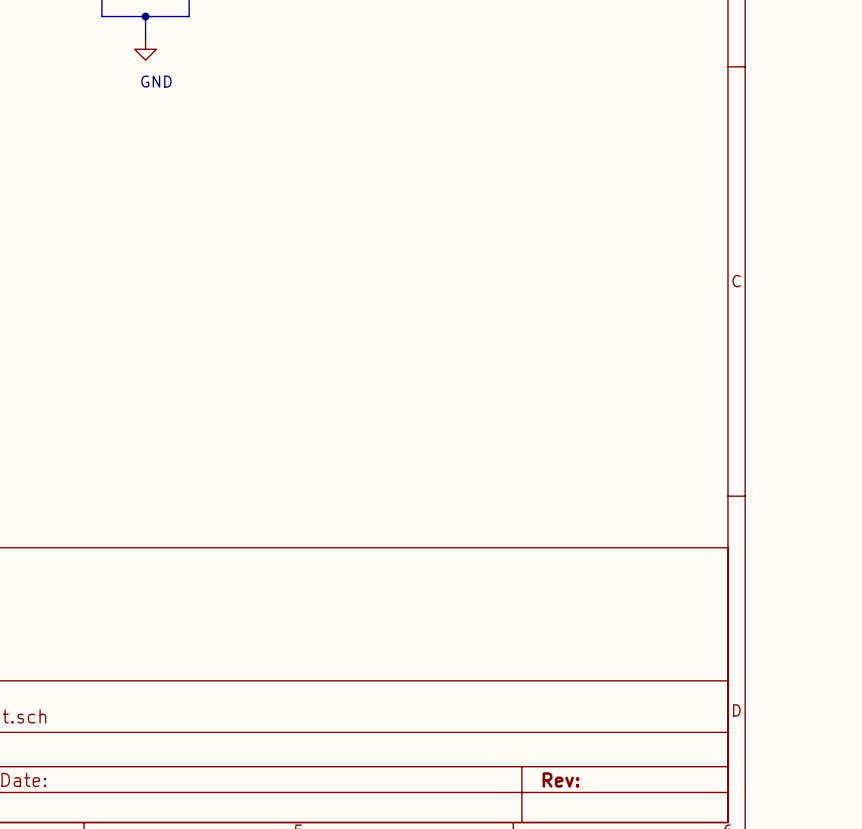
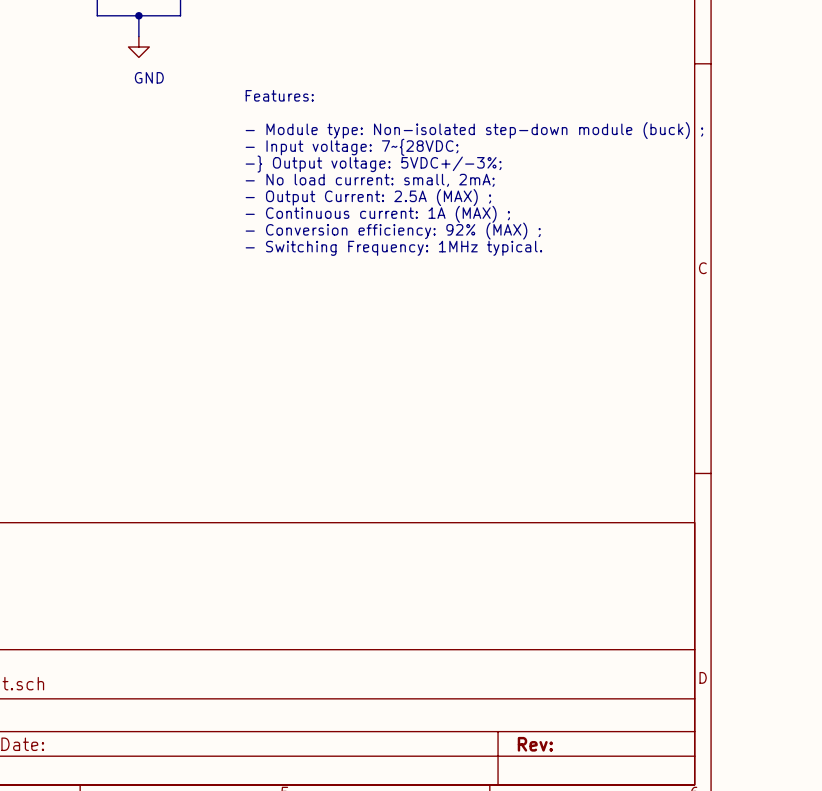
text: none -> Features: (279, 95)
text: none -> - Module type: Non-isolated step-down module (buck) ; (474, 130)
text: none -> - Input voltage: 7~{28VDC; (352, 147)
text: none -> -} Output voltage: 5VDC+/-3%; (373, 164)
text: none -> - No load current: small, 2mA; (370, 180)
text: none -> - Output Current: 2.5A (MAX) ; (368, 197)
text: none -> - Continuous current: 1A (MAX) ; (377, 214)
text: none -> - Conversion efficiency: 92% (MAX) ; (393, 231)
text: none -> - Switching Frequency: 1MHz typical. (393, 248)

